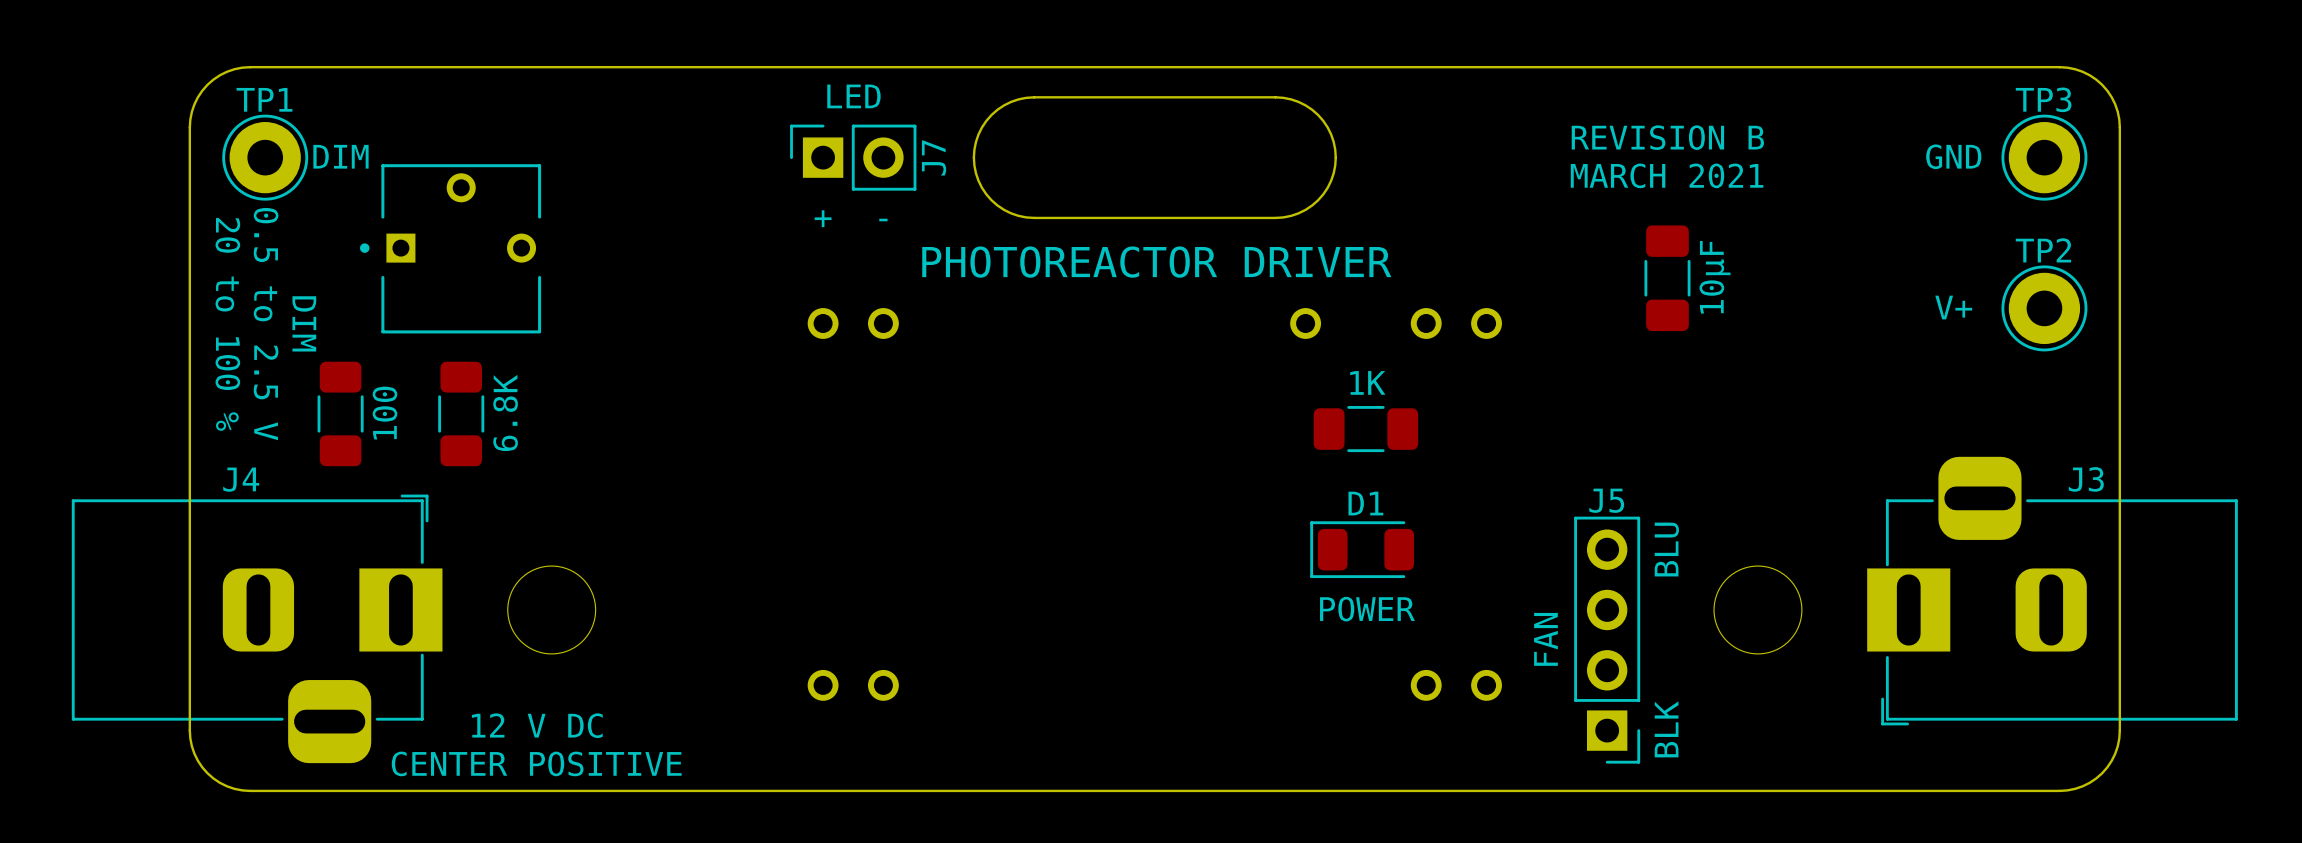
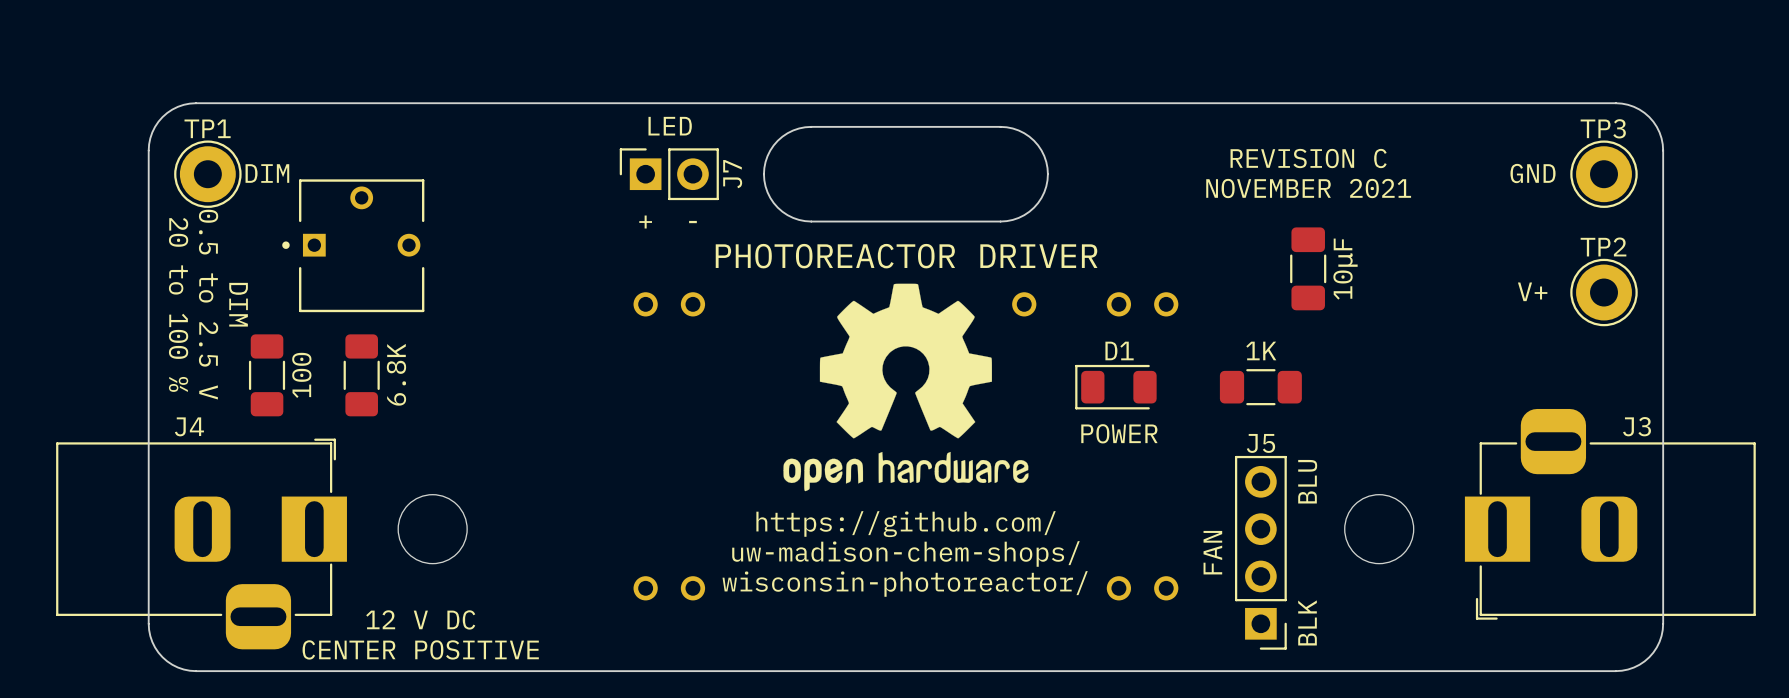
text: REVISION B (1667, 137) -> REVISION C (1308, 158)
text: MARCH 2021 (1667, 175) -> NOVEMBER 2021 (1308, 188)
drawing: none -> [783, 283, 1029, 492]
text position: 1K (1367, 382) -> 1K (1261, 350)
part position: (1365, 429) -> (1260, 387)
D1 position: (1362, 549) -> (1115, 387)
text: none -> https://github.com/ (906, 524)
text position: POWER (1367, 609) -> POWER (1119, 433)
text: none -> uw-madison-chem-shops/ (905, 553)
text: none -> wisconsin-photoreactor/ (905, 583)

